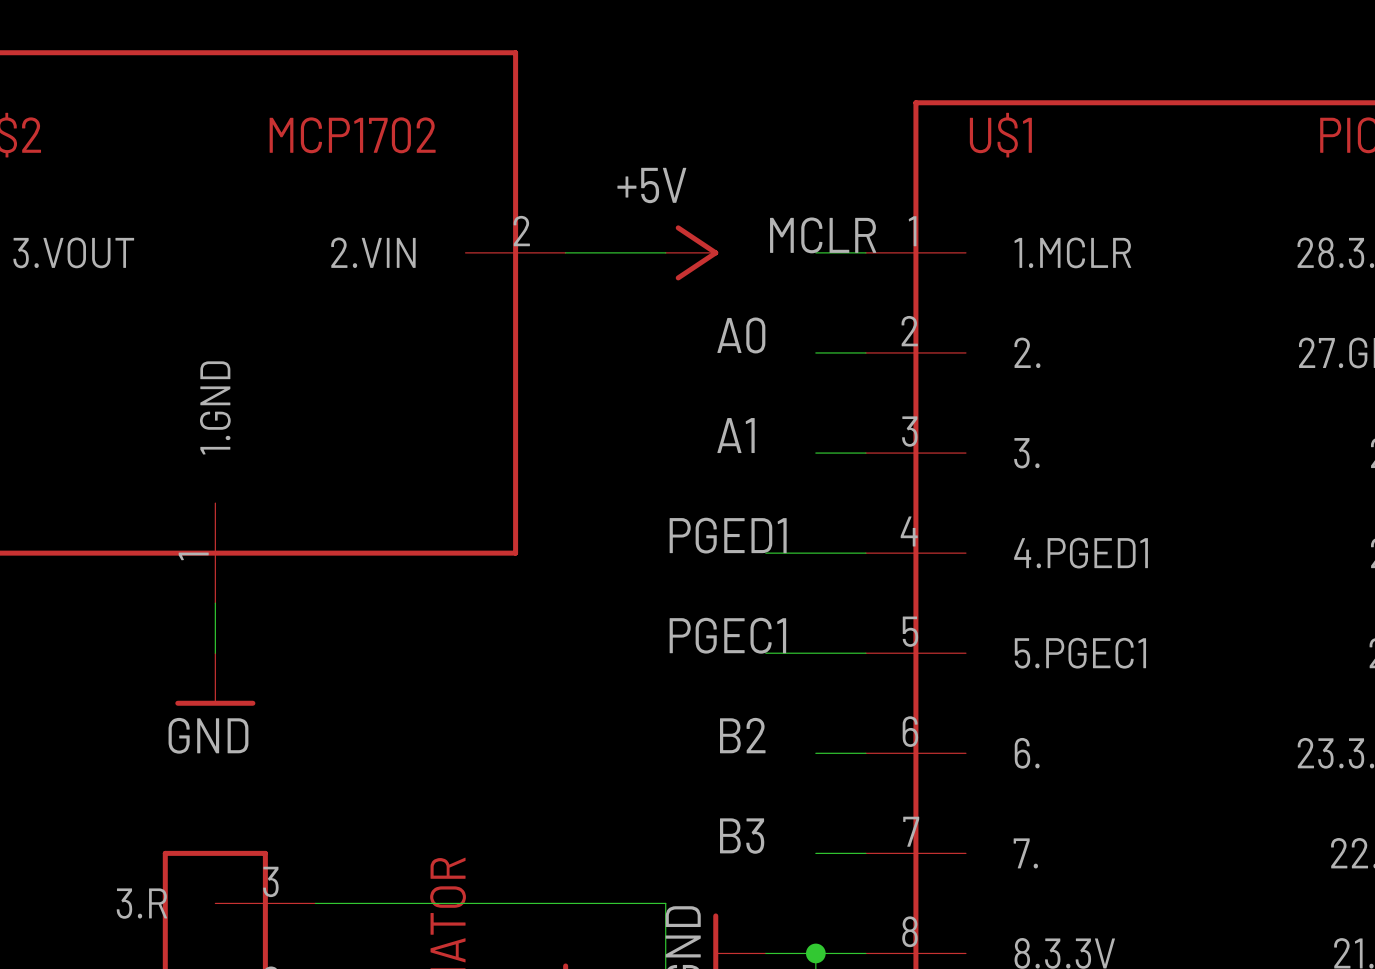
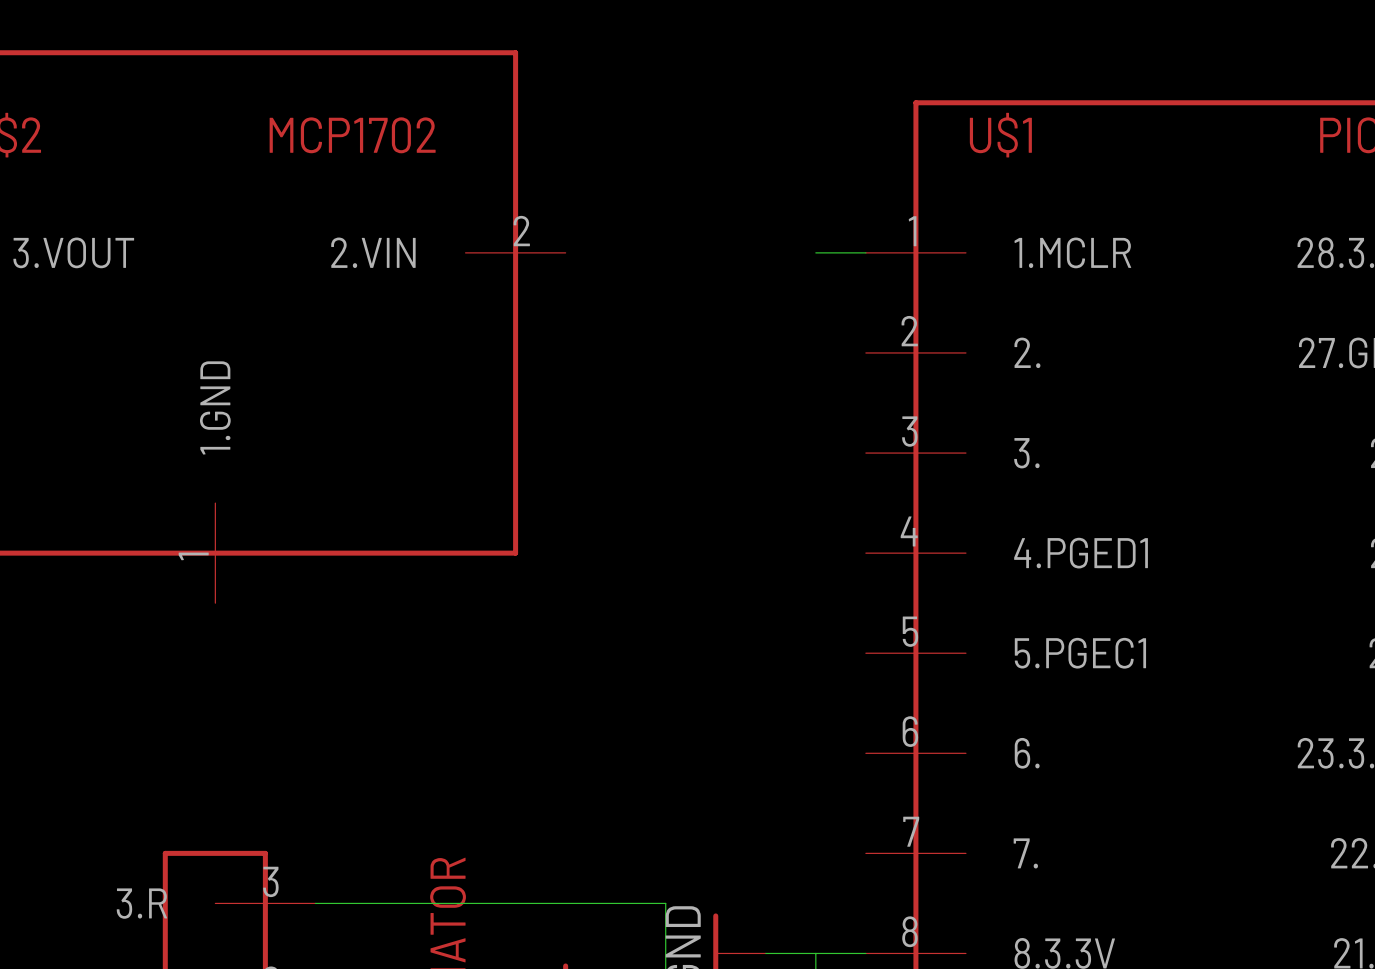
label: MCLR (823, 235) -> none
wire: (565, 252) (665, 252) -> none
power symbol: +5V (691, 252) -> none
label: A0 (741, 335) -> none
wire: (815, 352) (865, 352) -> none
label: A1 (735, 435) -> none
wire: (815, 453) (865, 453) -> none
label: PGED1 (728, 535) -> none
wire: (765, 553) (865, 553) -> none
wire: (215, 603) (215, 653) -> none
label: PGEC1 (727, 635) -> none
wire: (765, 653) (865, 653) -> none
power symbol: GND (215, 679) -> none
label: B2 (742, 735) -> none
wire: (815, 753) (865, 753) -> none
label: B3 (742, 836) -> none
wire: (815, 853) (865, 853) -> none
junction: (815, 953) -> none

